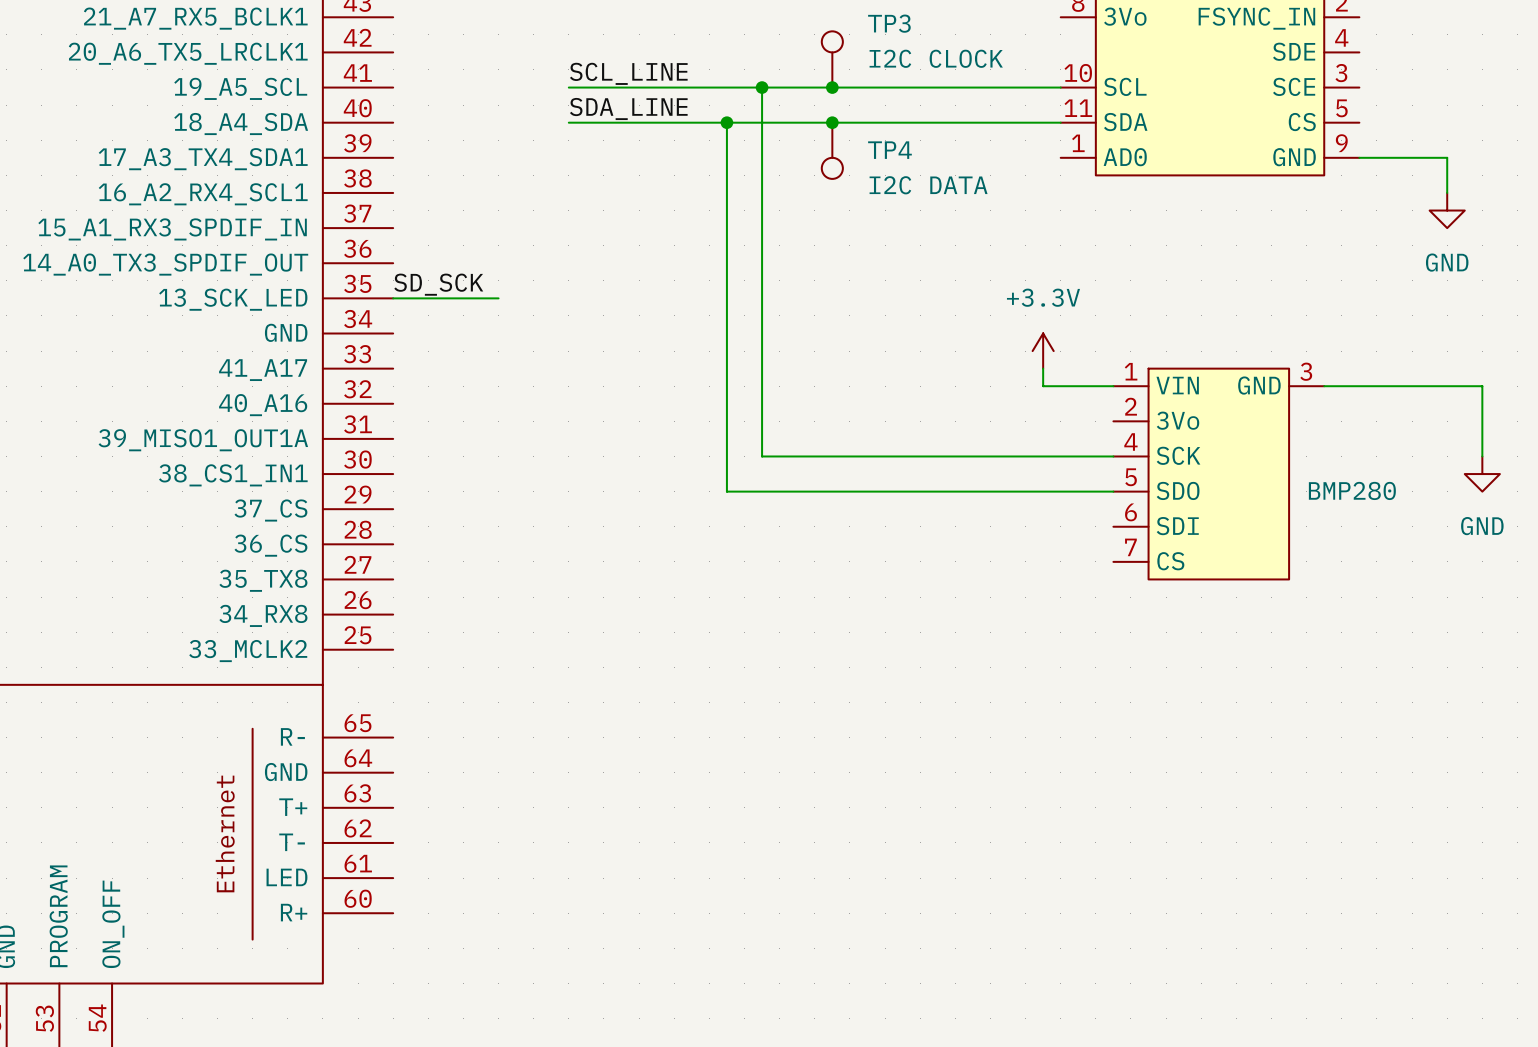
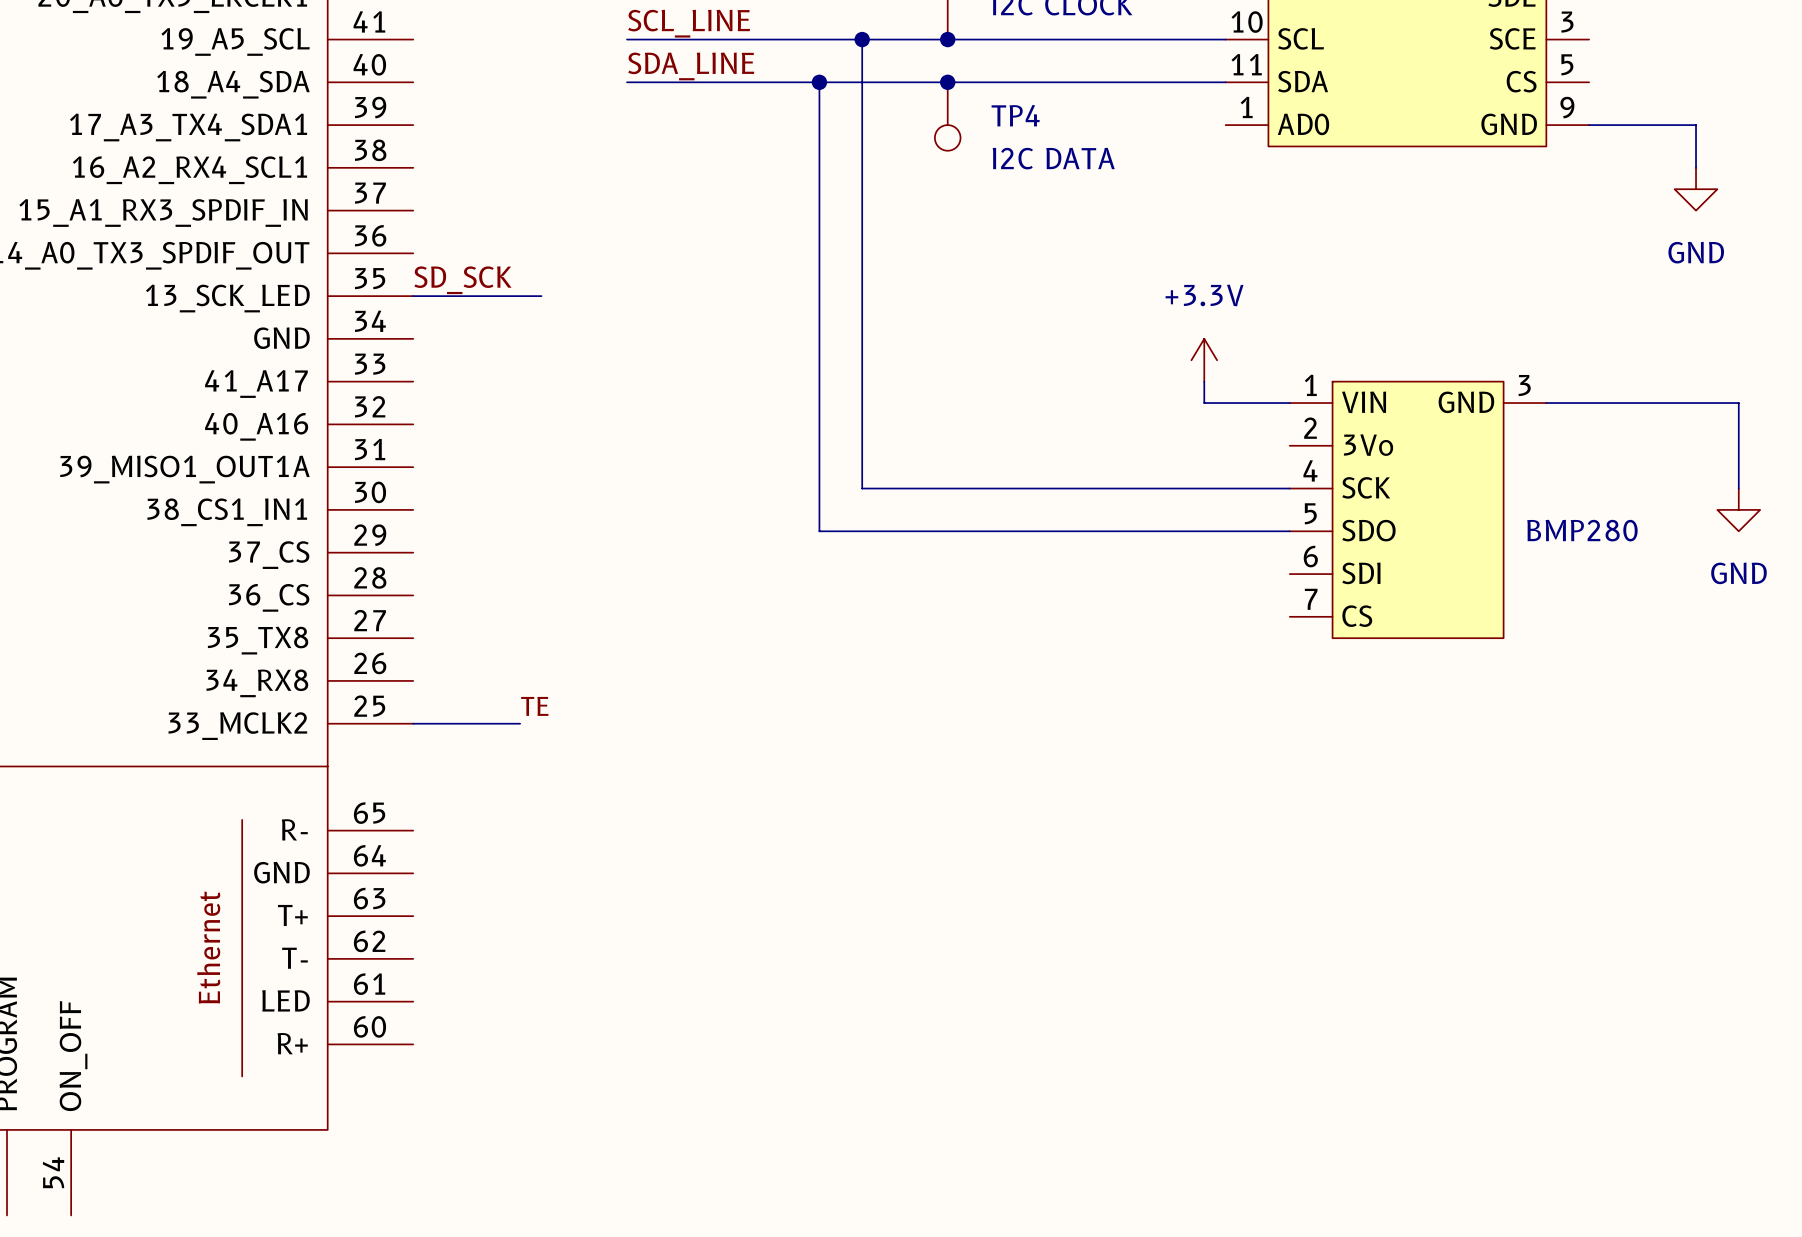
label: none -> TE (534, 706)
wire: none -> (413, 723) (520, 723)

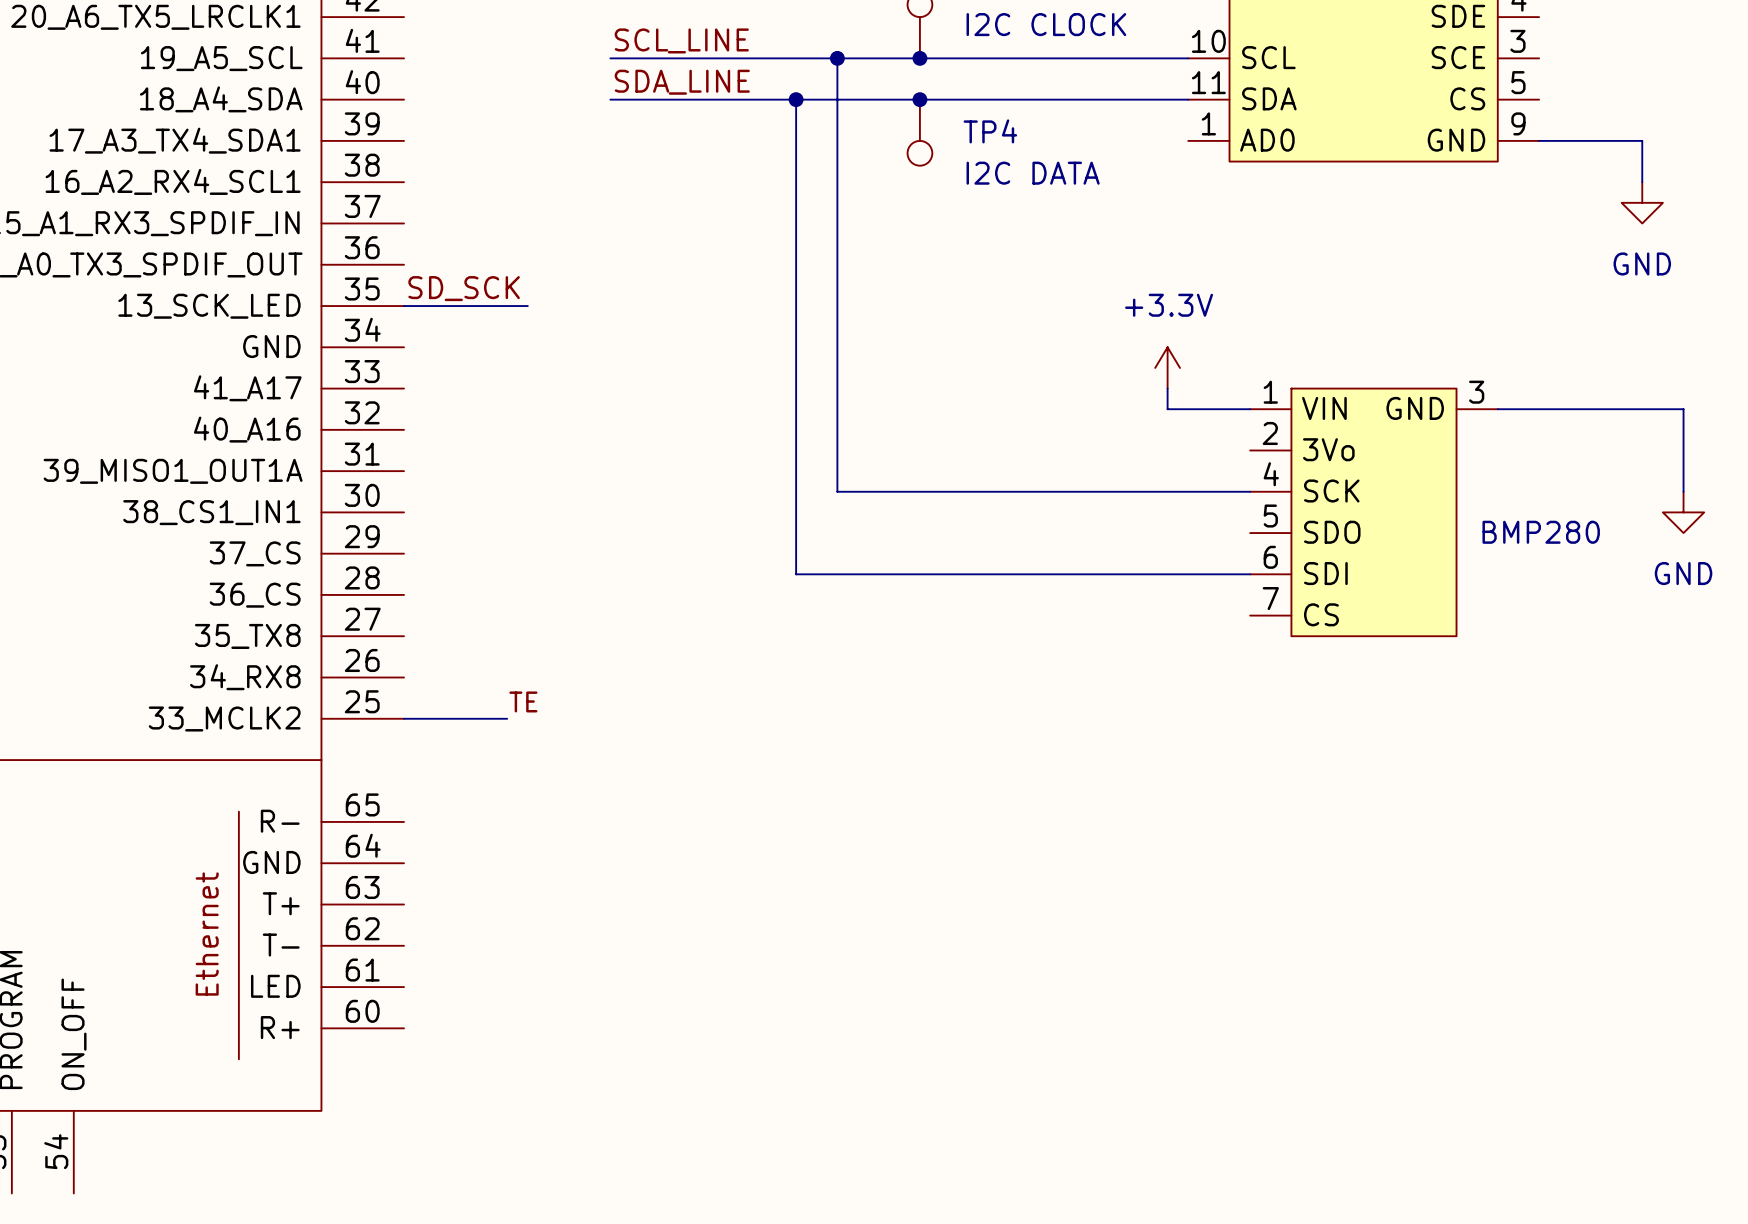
wire: (819, 531) (1289, 531) -> (796, 533) (796, 574) (1250, 574)

